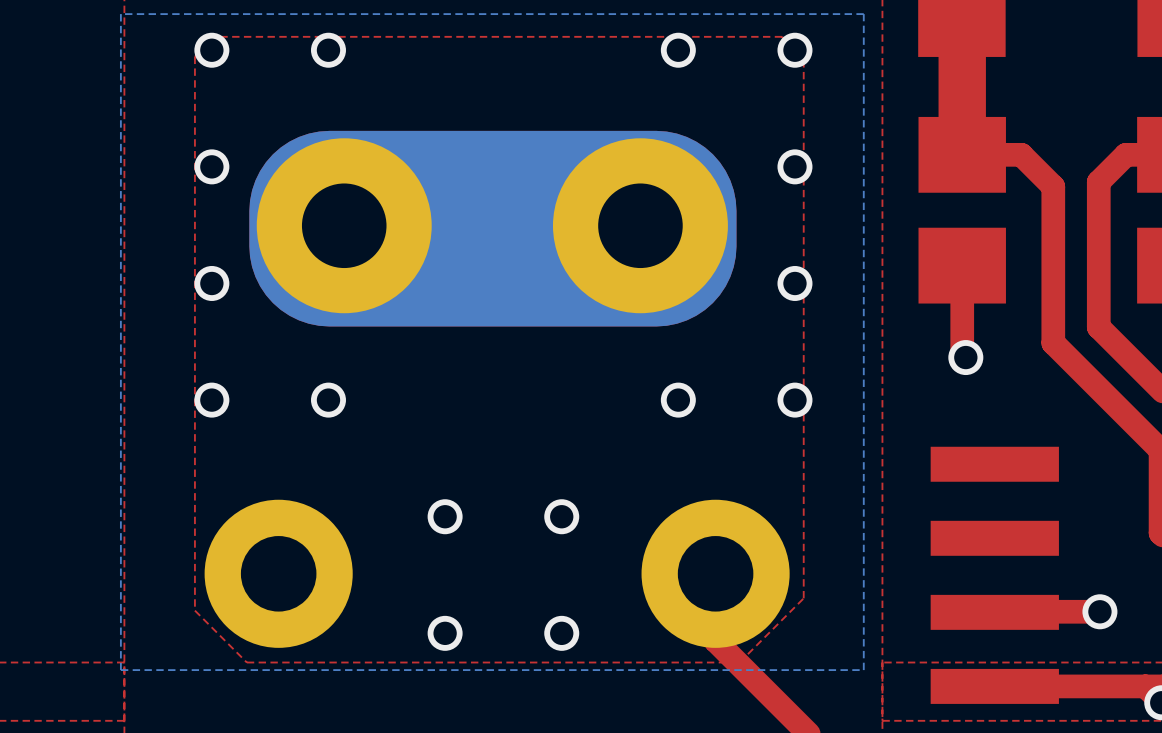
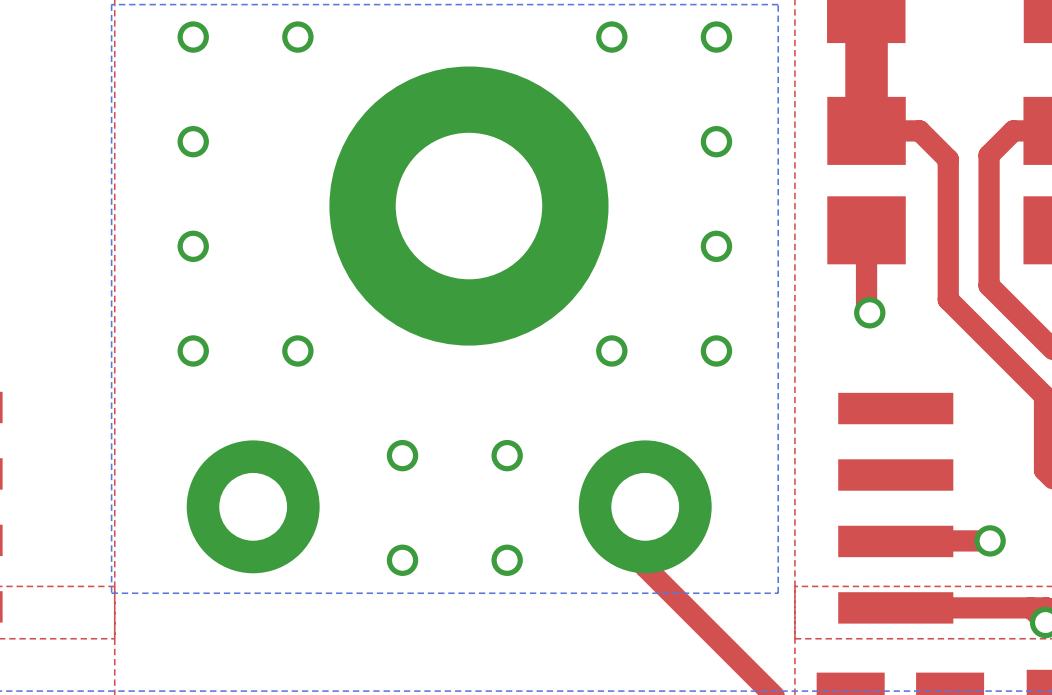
top zone outline: (782, 36) (214, 36) (194, 56) (194, 610) (246, 662) (739, 662) (803, 598) (803, 58) (782, 36) -> none
part footprint: [249, 130, 737, 327] -> [329, 66, 609, 346]

